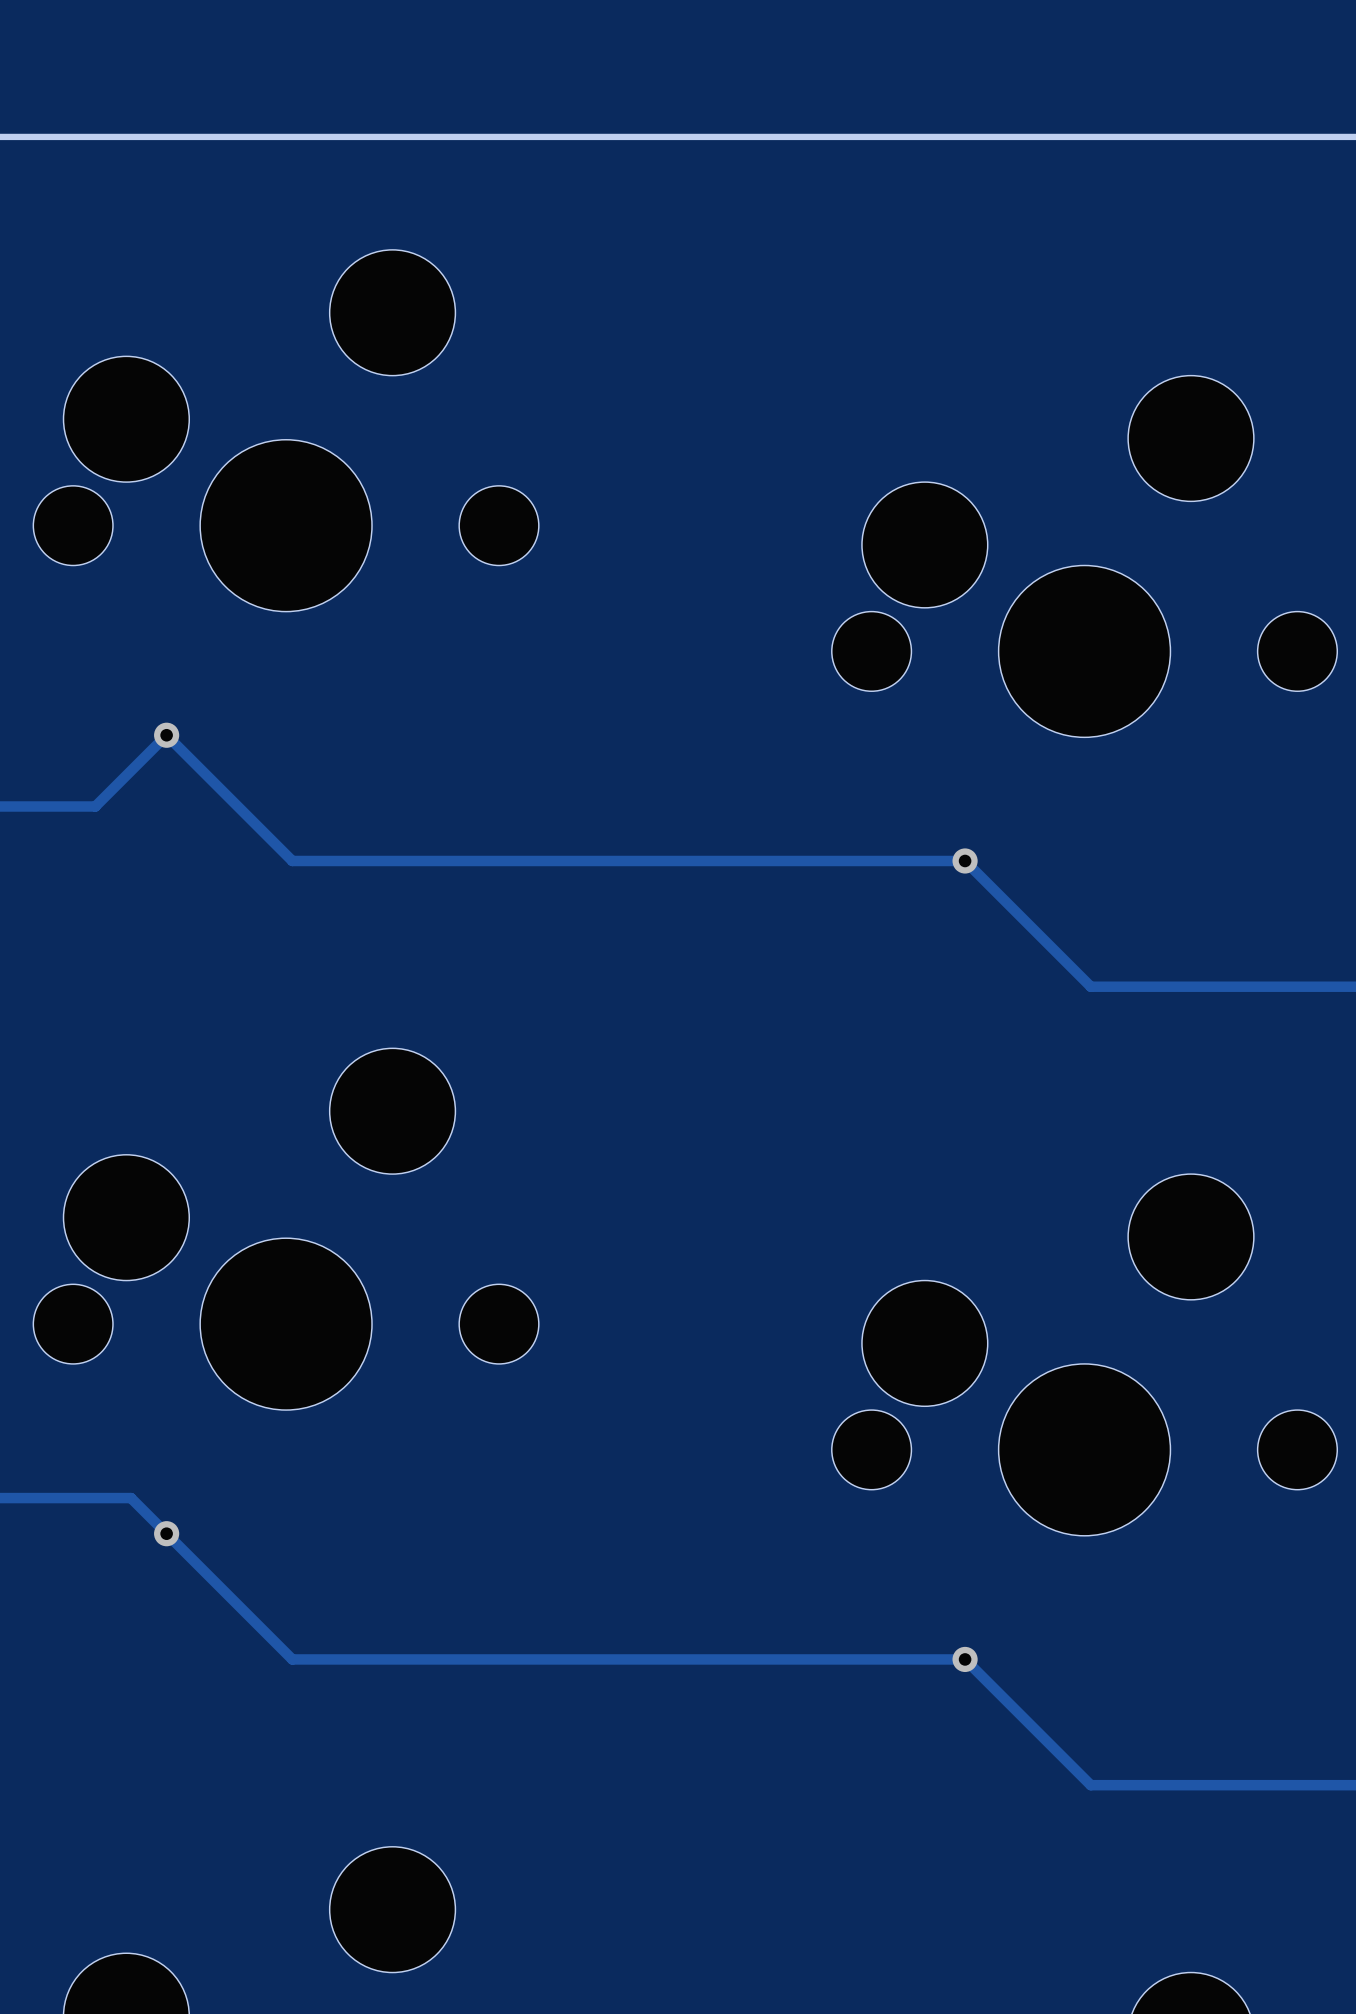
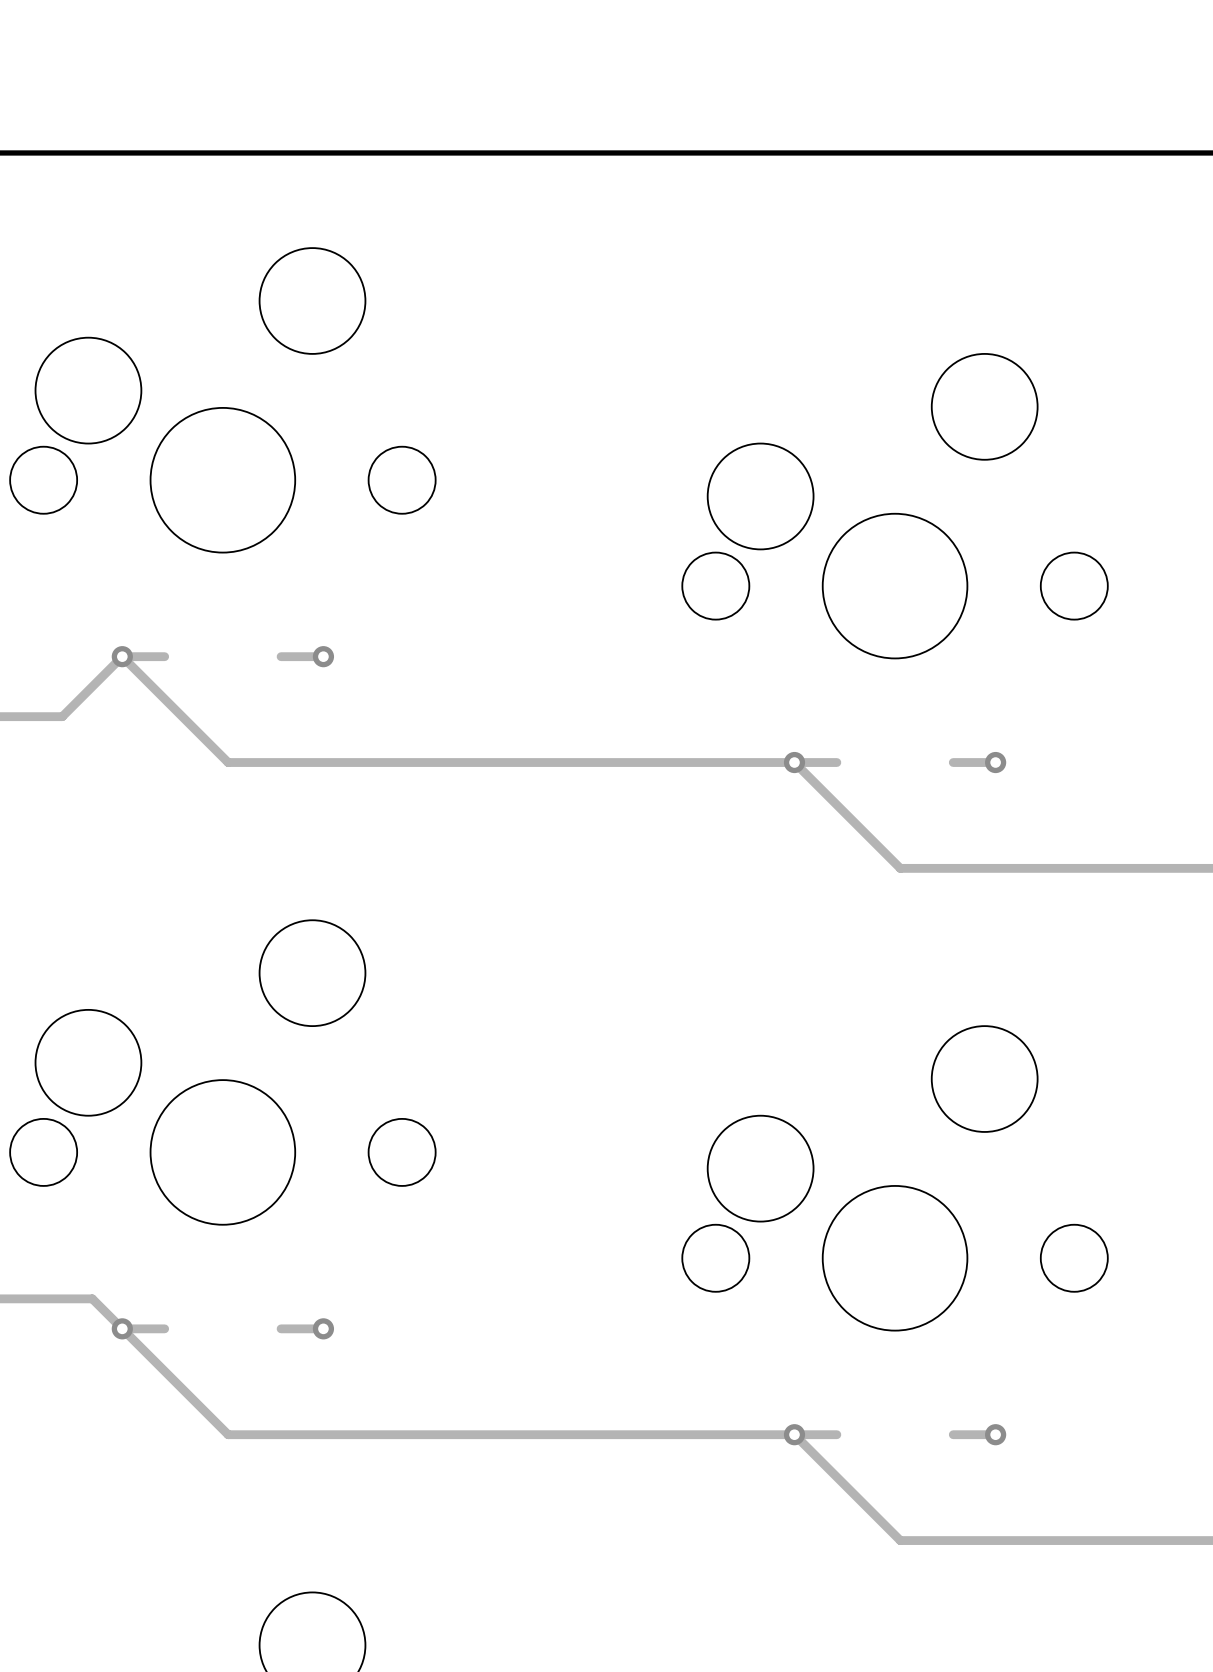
track: none -> (122, 656) (164, 656)
track: none -> (281, 656) (323, 656)
via: none -> (323, 656)
track: none -> (794, 762) (836, 762)
track: none -> (953, 762) (995, 762)
via: none -> (995, 762)
track: none -> (122, 1328) (164, 1328)
track: none -> (281, 1328) (323, 1328)
via: none -> (323, 1328)
track: none -> (794, 1434) (836, 1434)
track: none -> (953, 1434) (995, 1434)
via: none -> (995, 1434)

